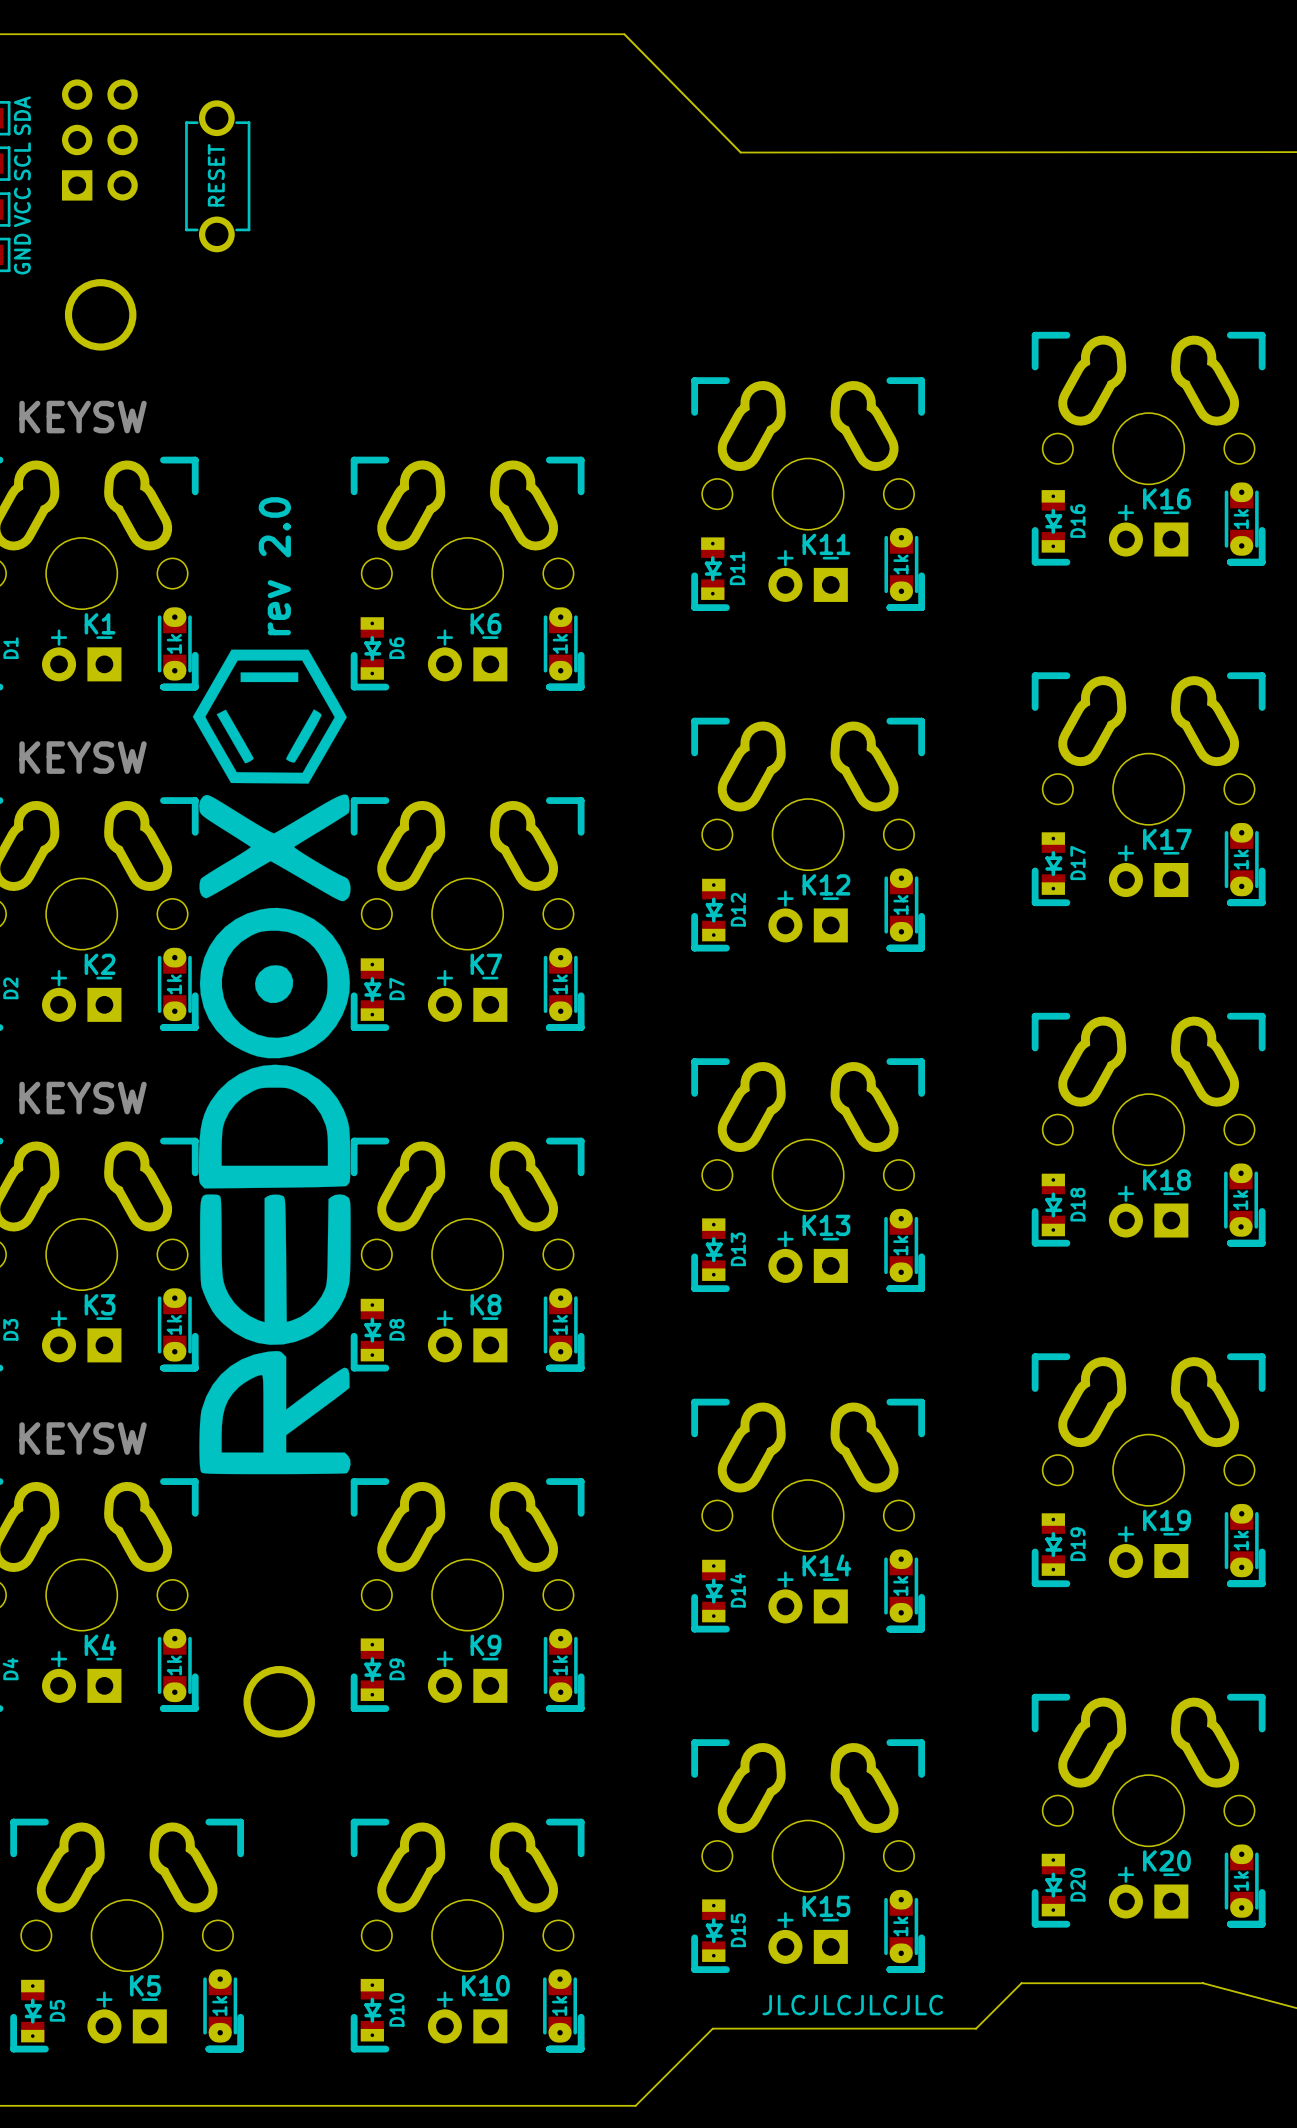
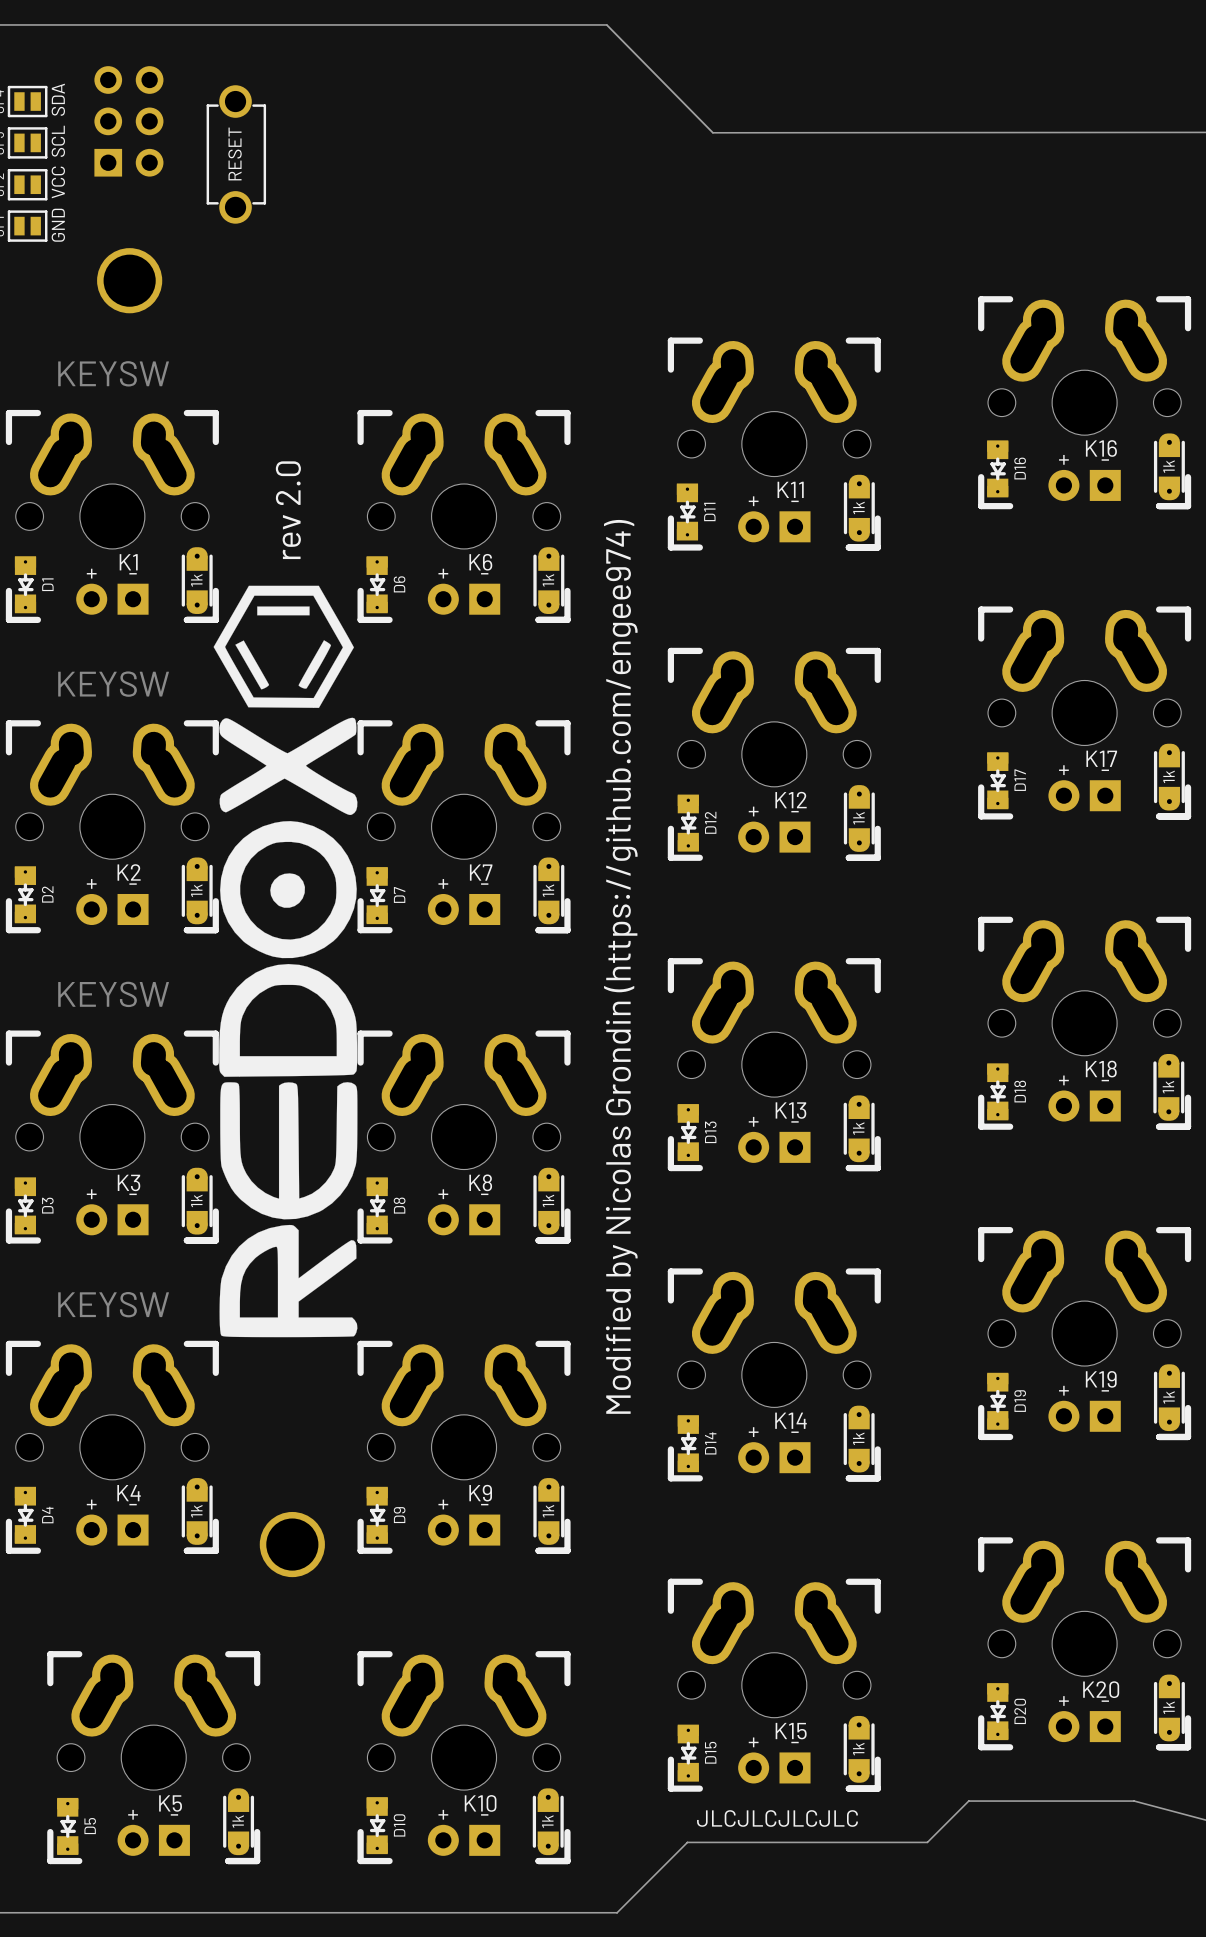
text: none -> Modified by Nicolas Grondin (https://github.com/engee974) (620, 966)
text position: JLCJLCJLCJLC (852, 2005) -> JLCJLCJLCJLC (777, 1818)

